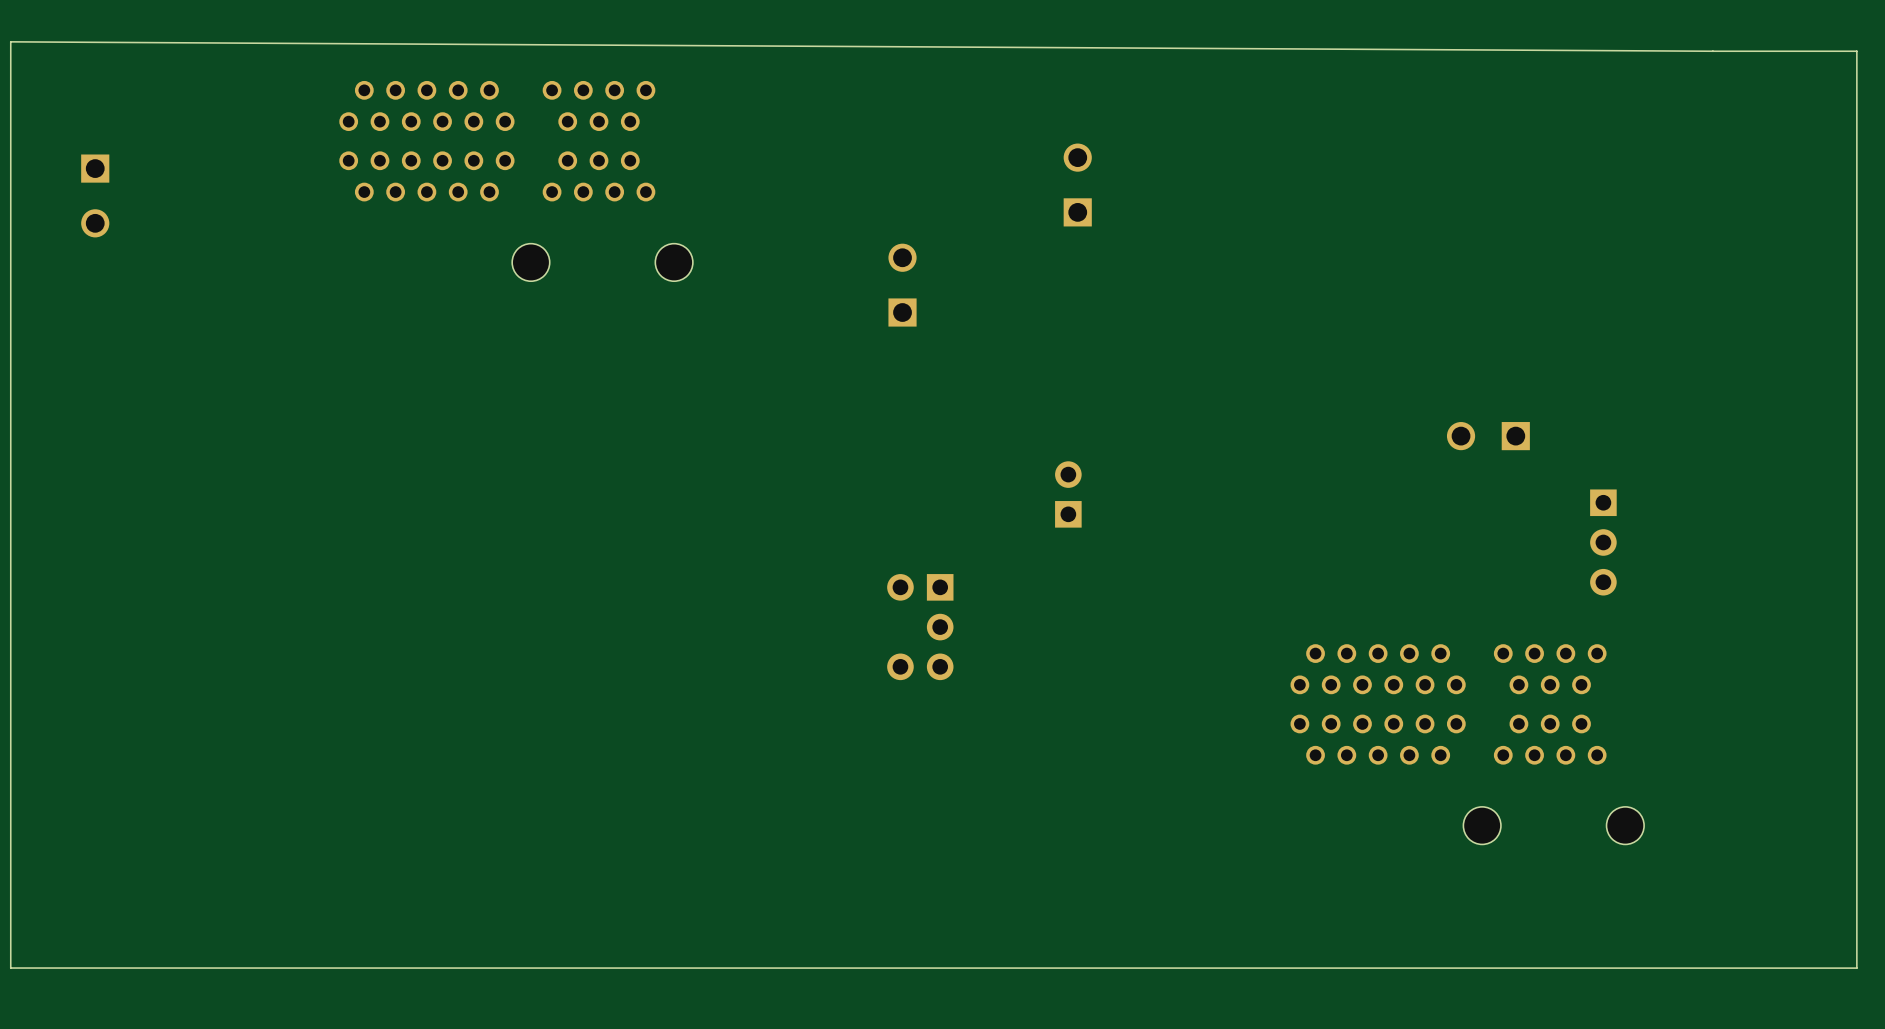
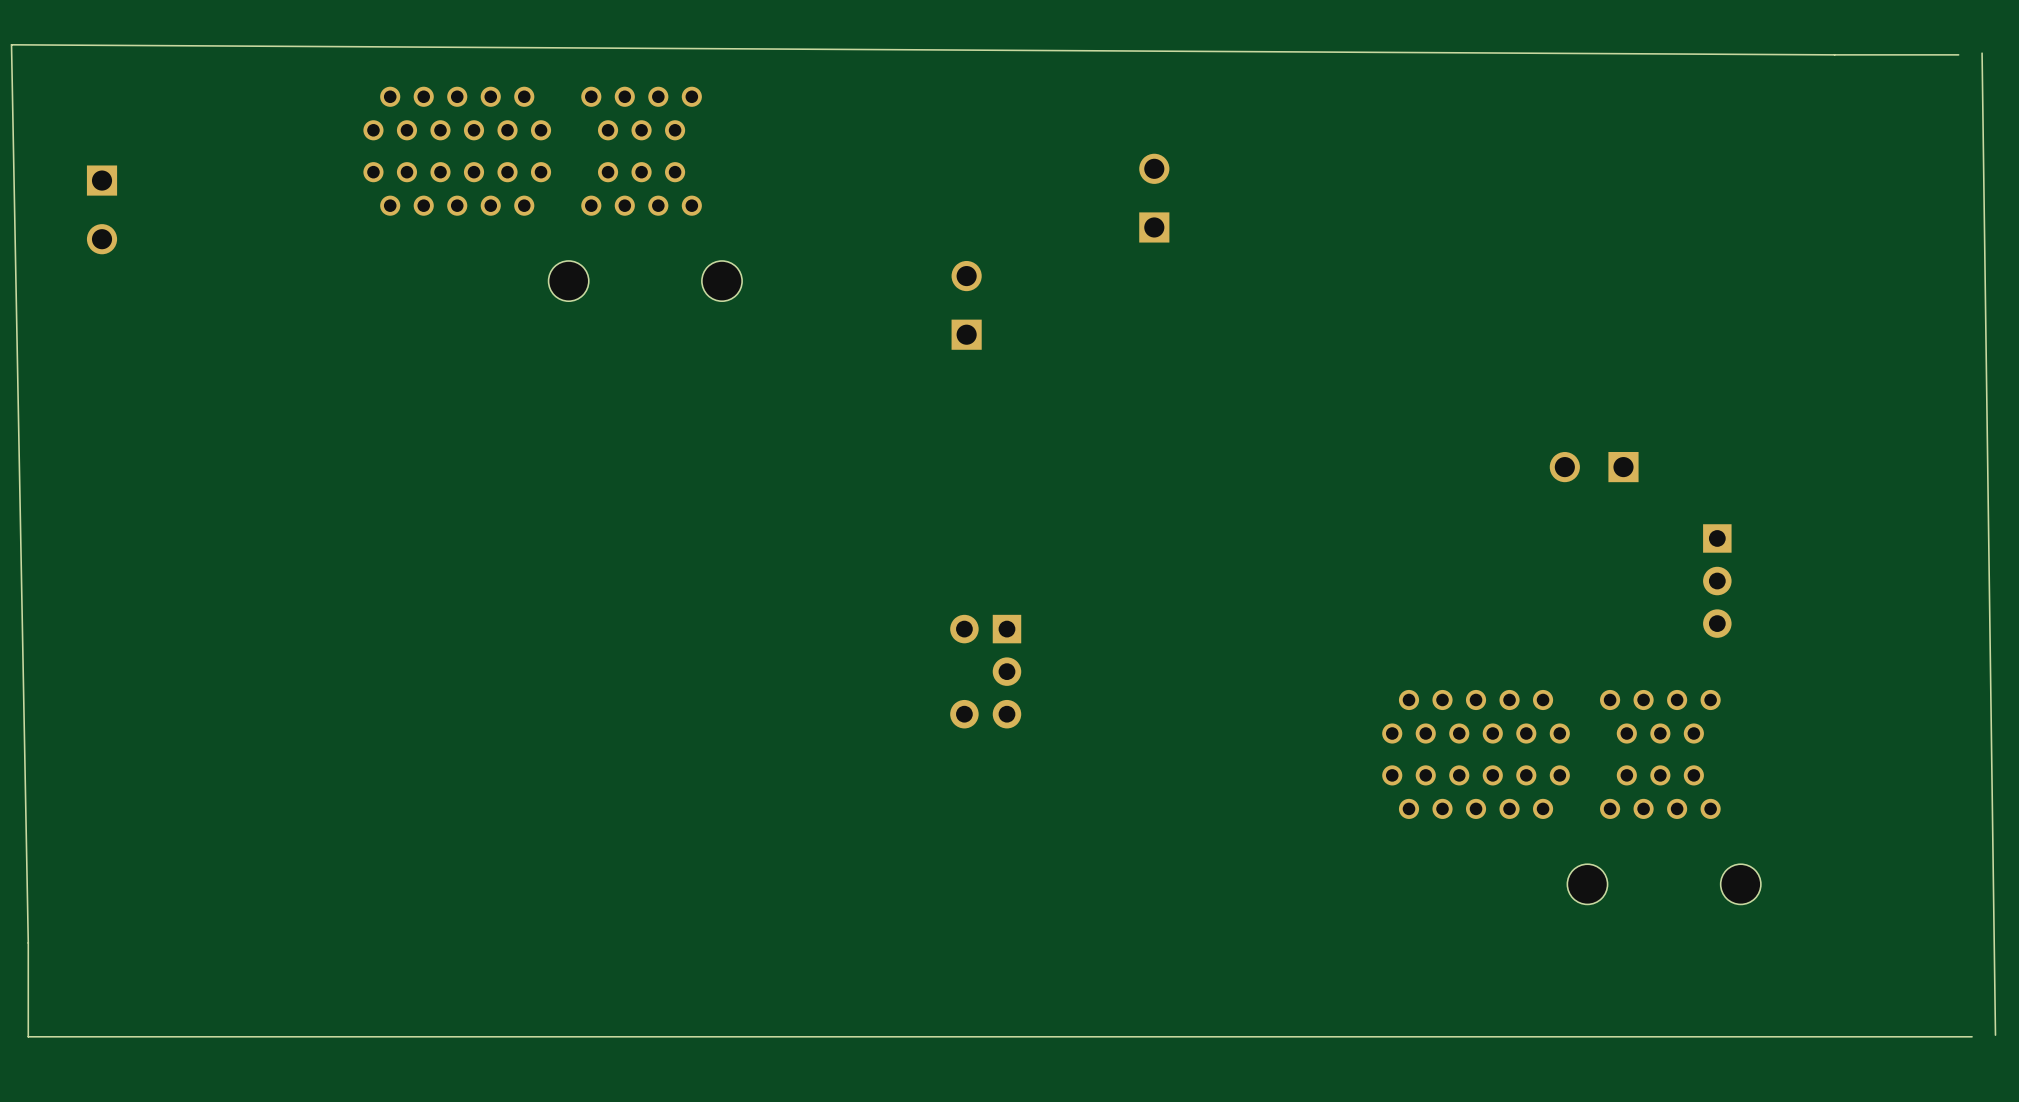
board edge: (10, 41) (10, 968) (1856, 968) (1856, 51) (1828, 51) -> (11, 44) (28, 942) (28, 1036) (1972, 1036)
board edge: none -> (1982, 53) (1995, 1035)
part: (1068, 494) -> none

